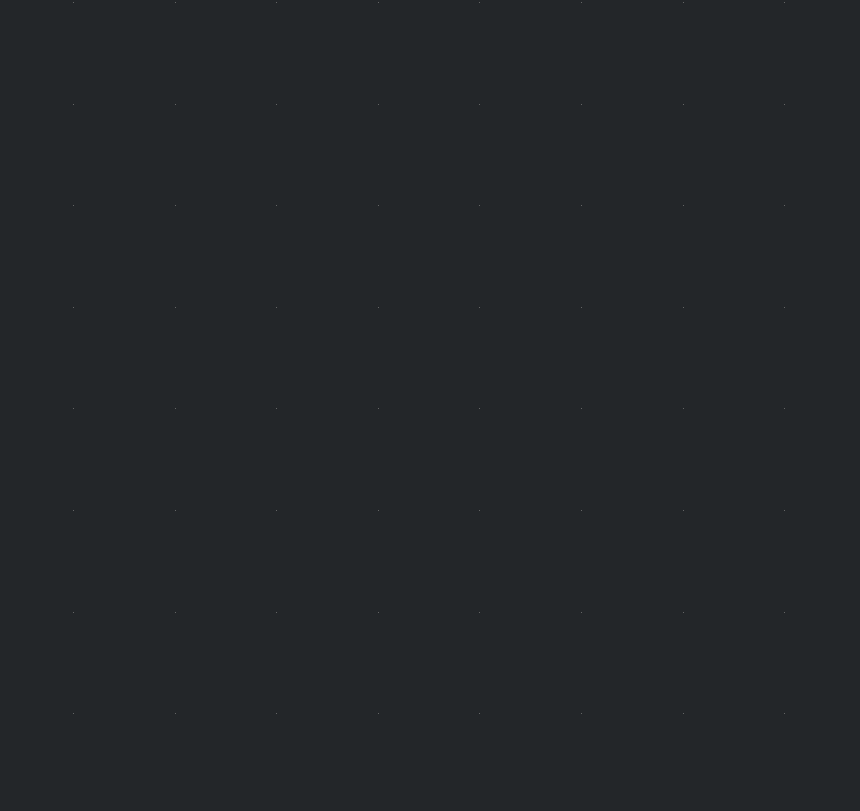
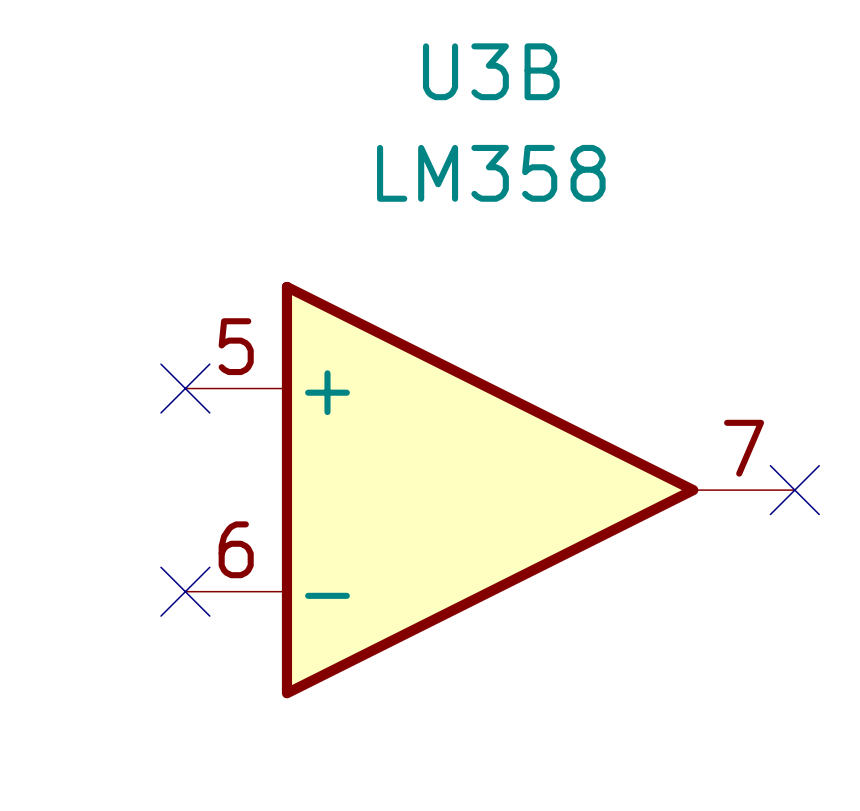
no-connect mark: none -> (185, 388)
U3B: none -> LM358 (490, 490)
no-connect mark: none -> (794, 490)
no-connect mark: none -> (185, 591)

